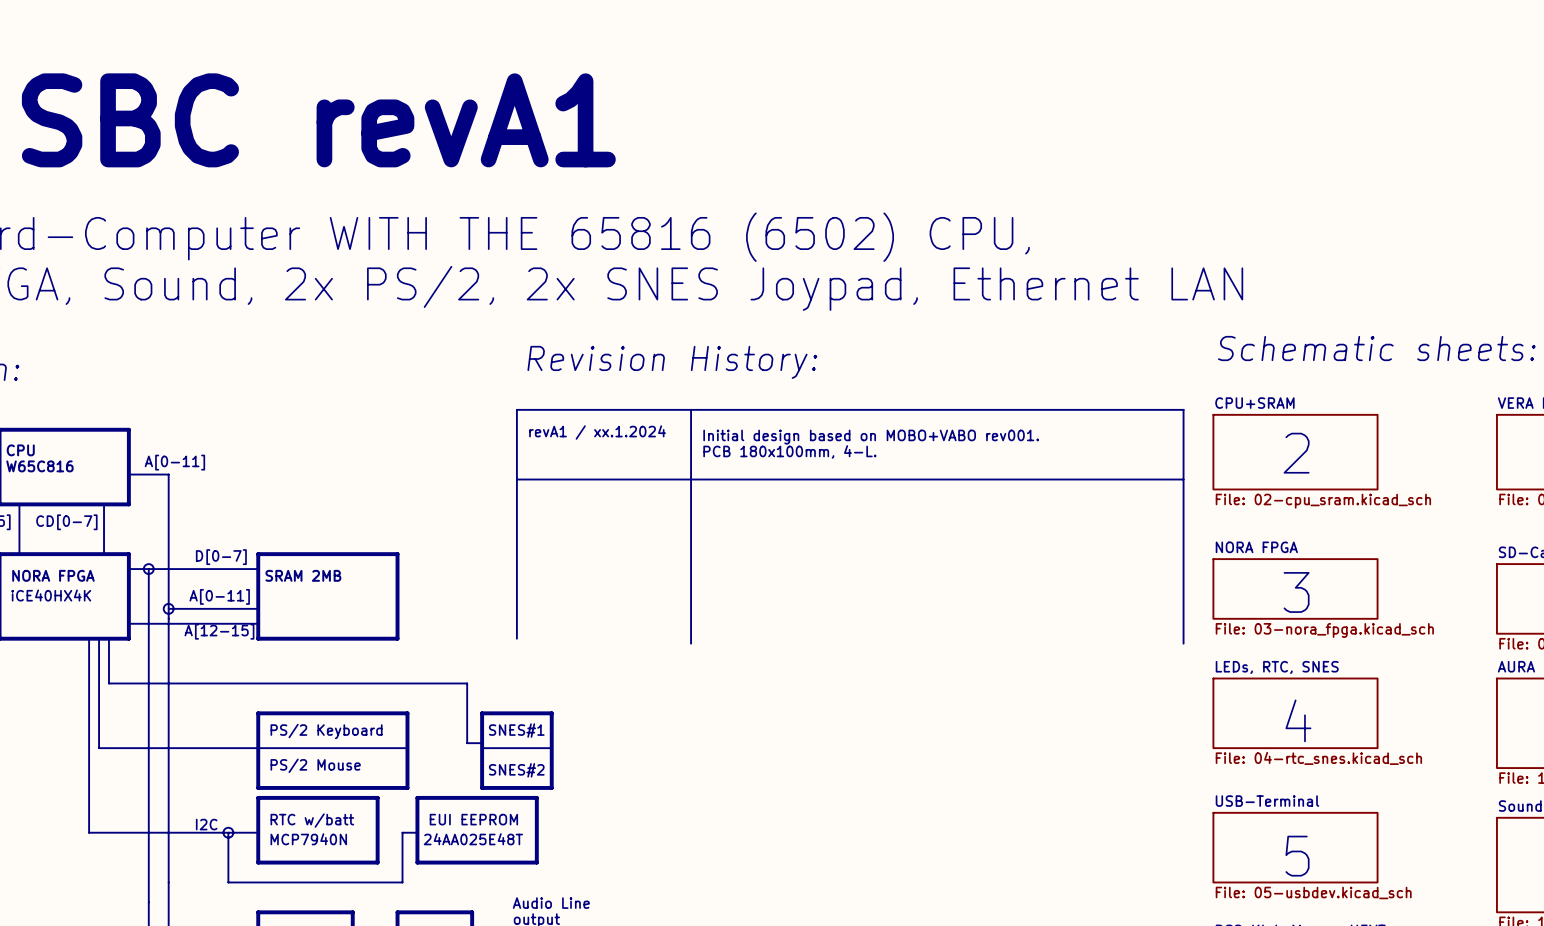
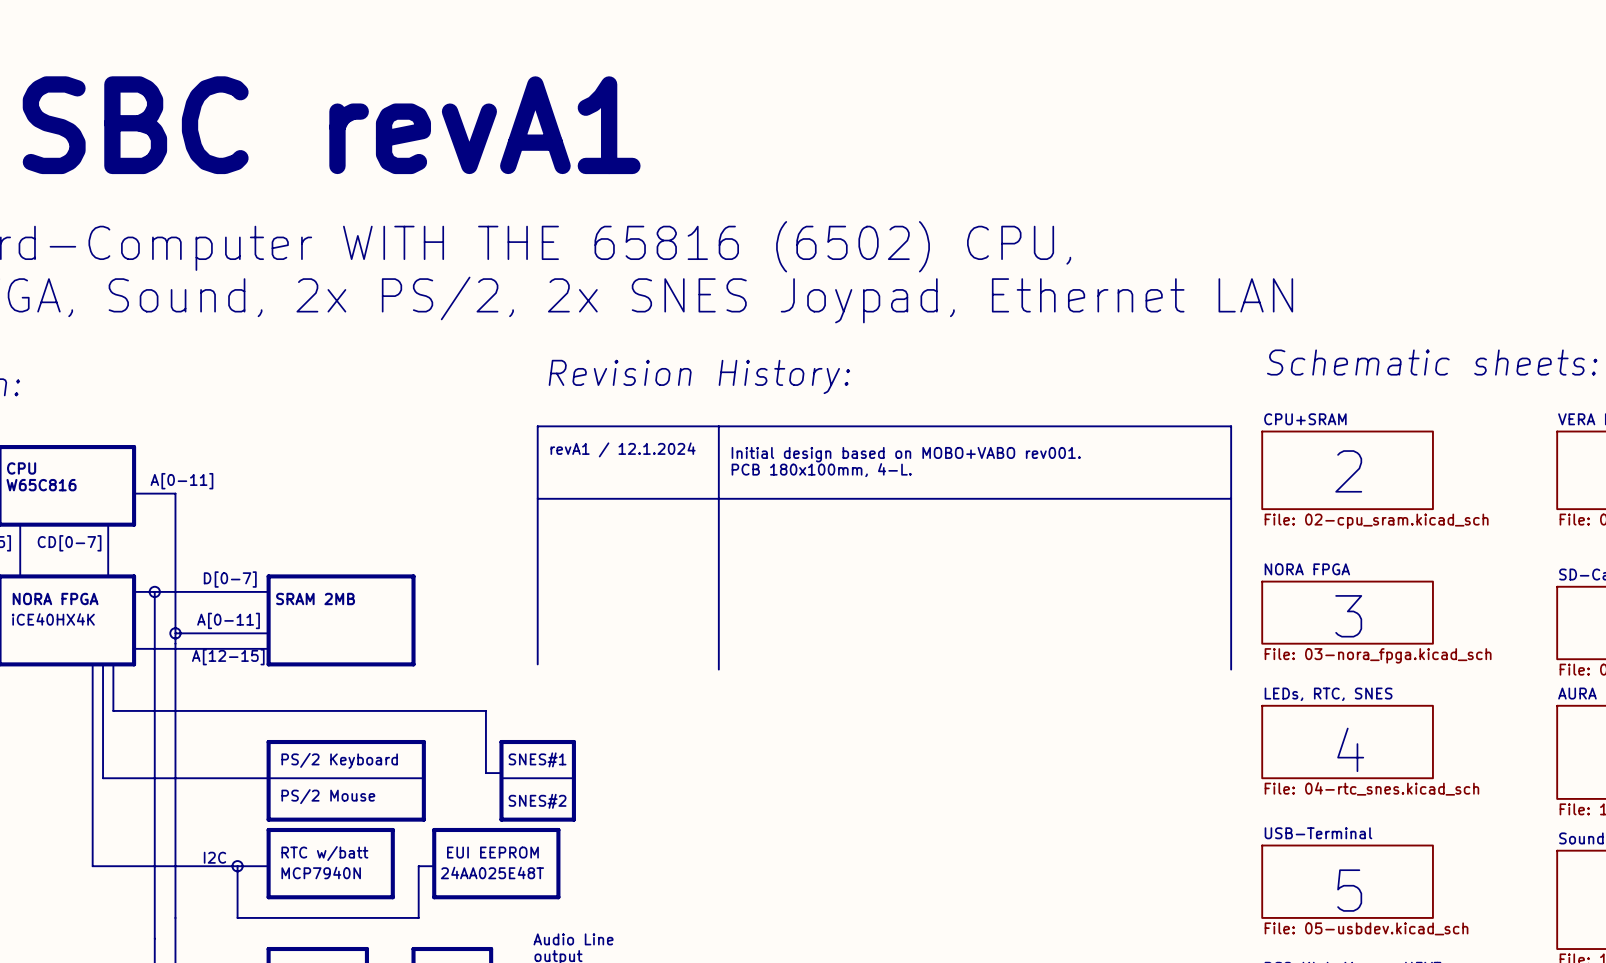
text: revA1 / xx.1.2024 (597, 432) -> revA1 / 12.1.2024 (623, 449)

